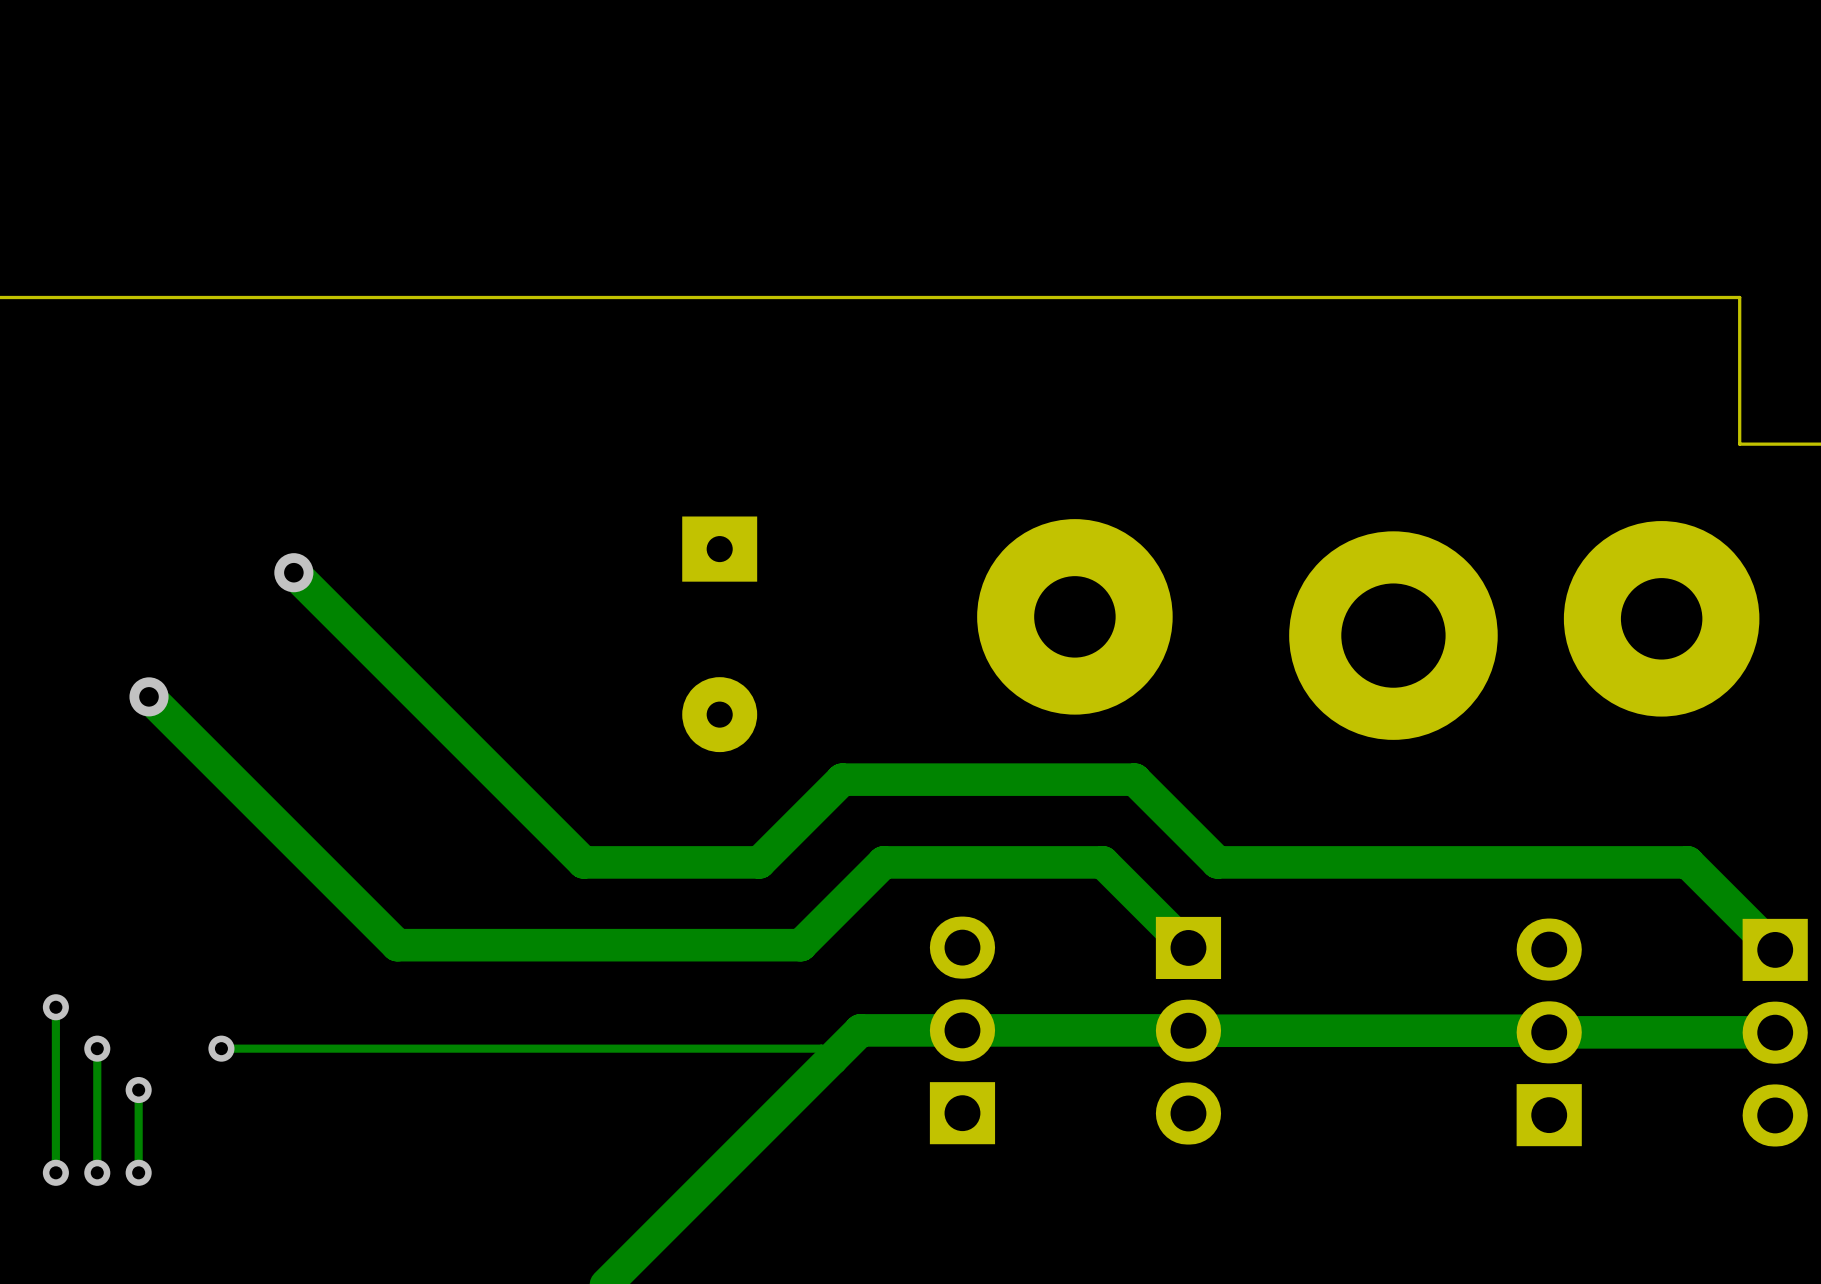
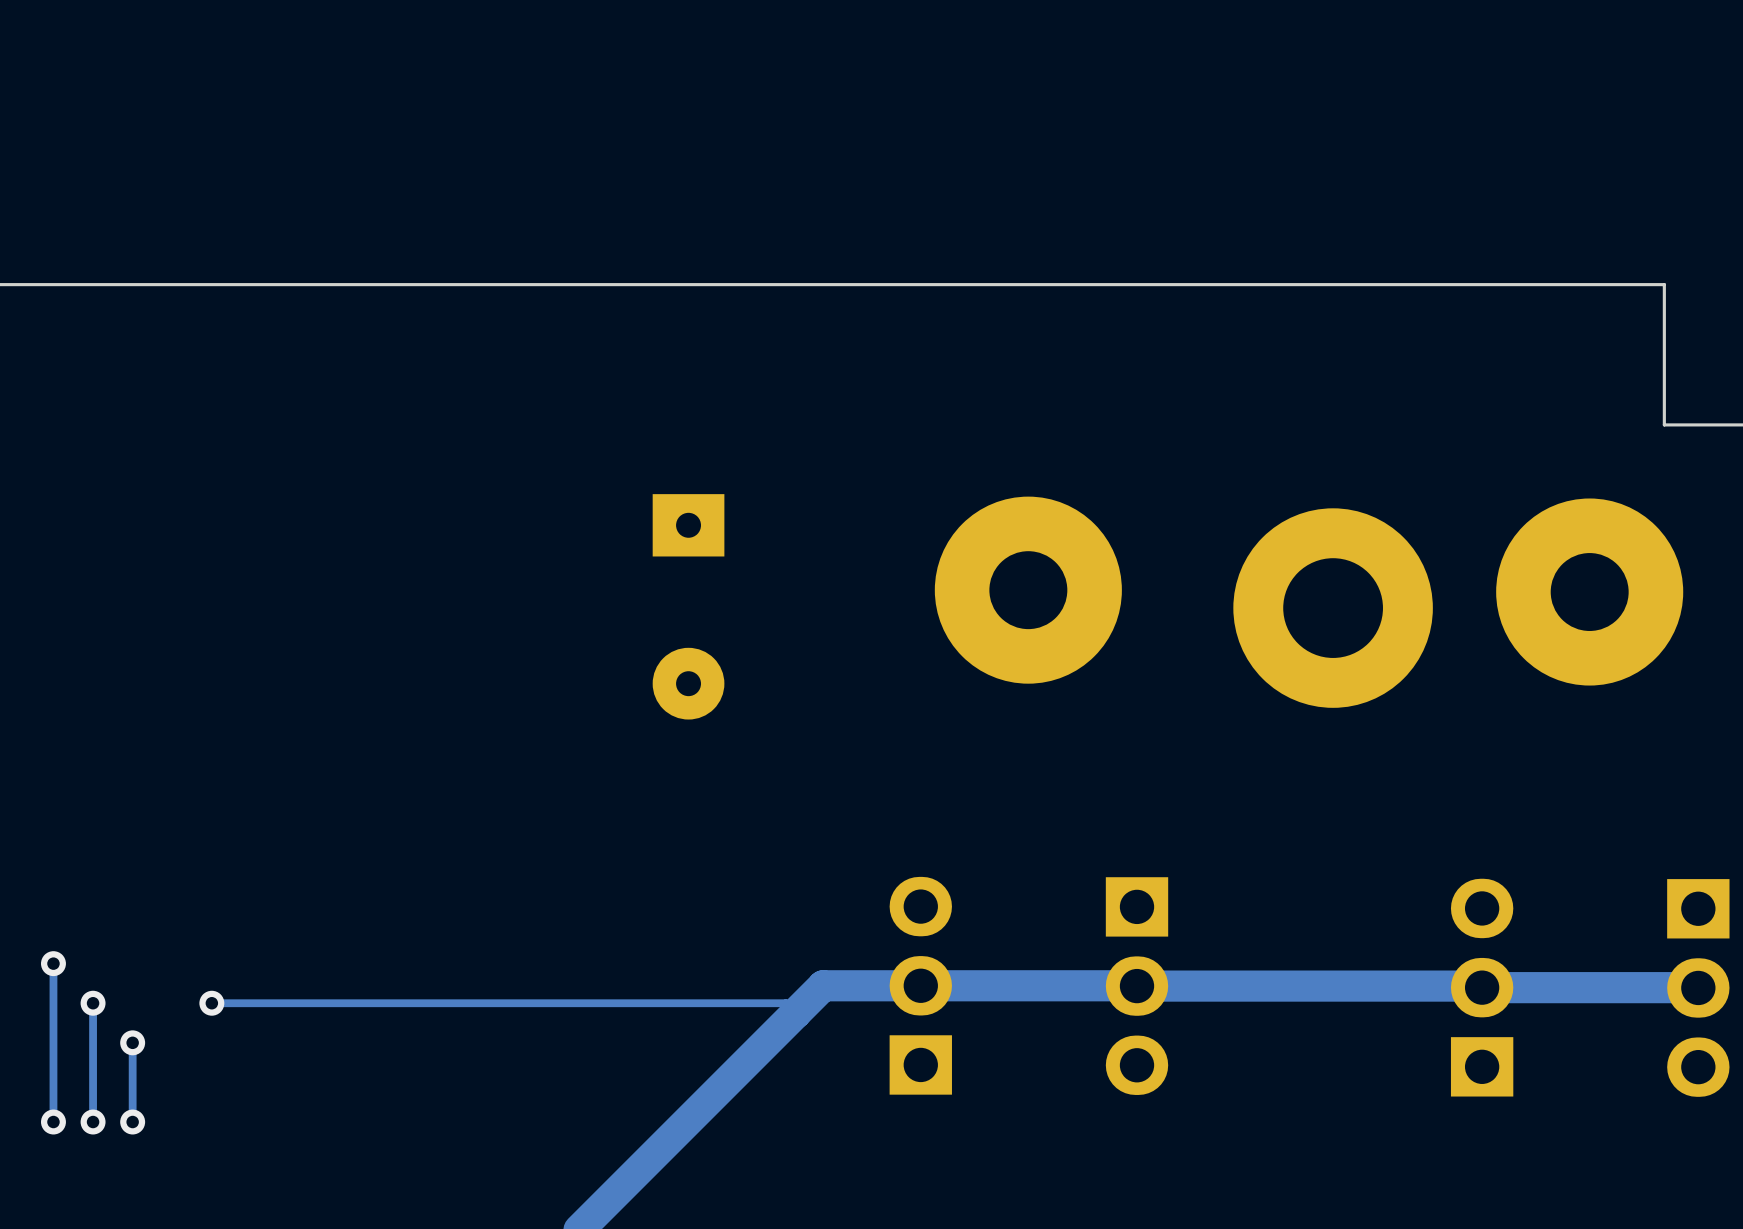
track: (293, 572) (583, 862) (759, 862) (842, 779) (1134, 779) (1217, 862) (1687, 862) (1775, 949) -> none
via: (293, 572) -> none
track: (149, 696) (397, 945) (800, 945) (883, 862) (1102, 862) (1188, 947) -> none
via: (149, 696) -> none

